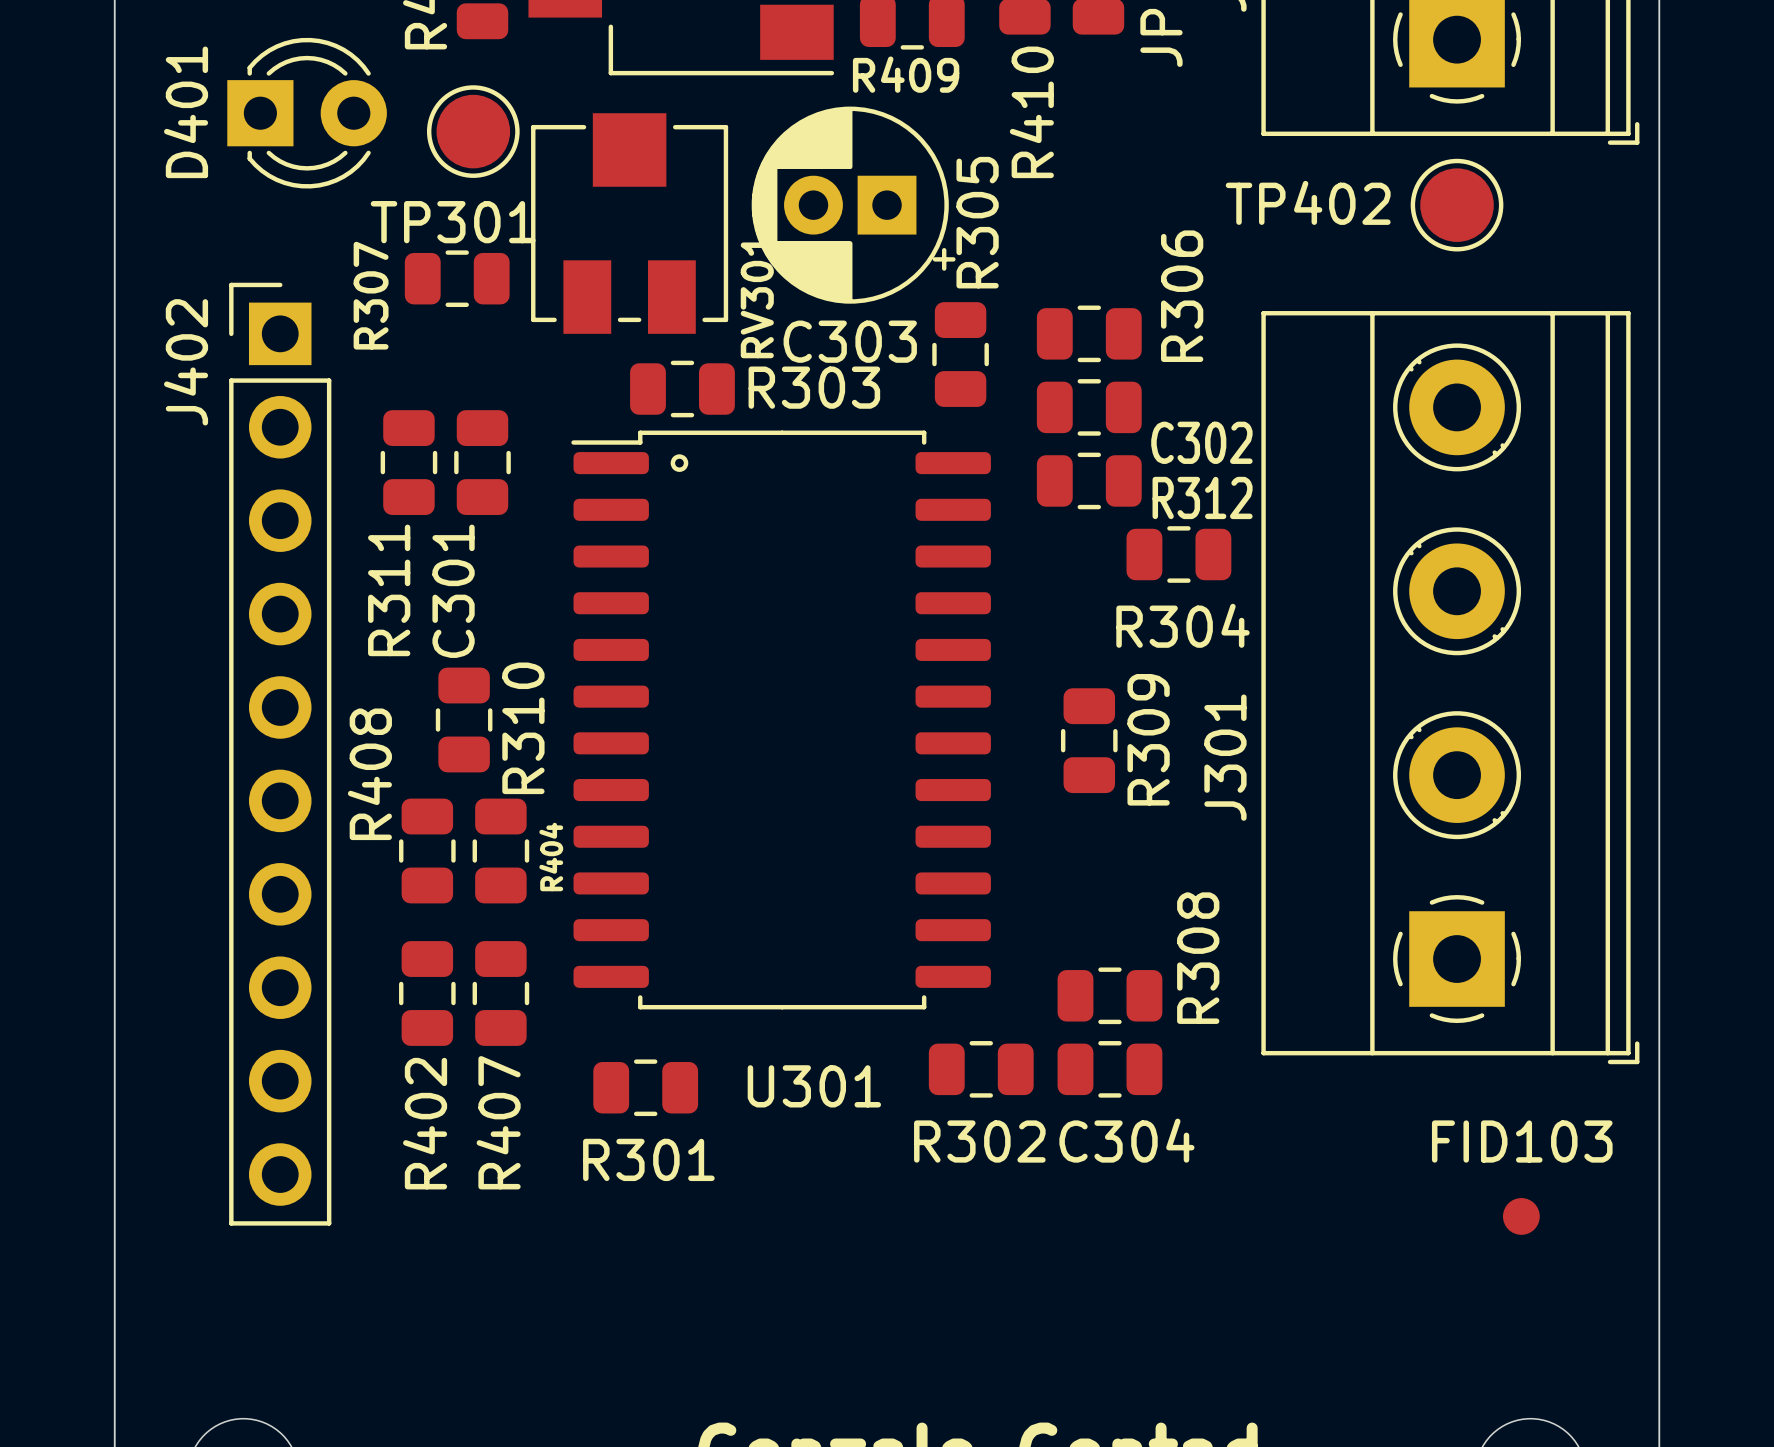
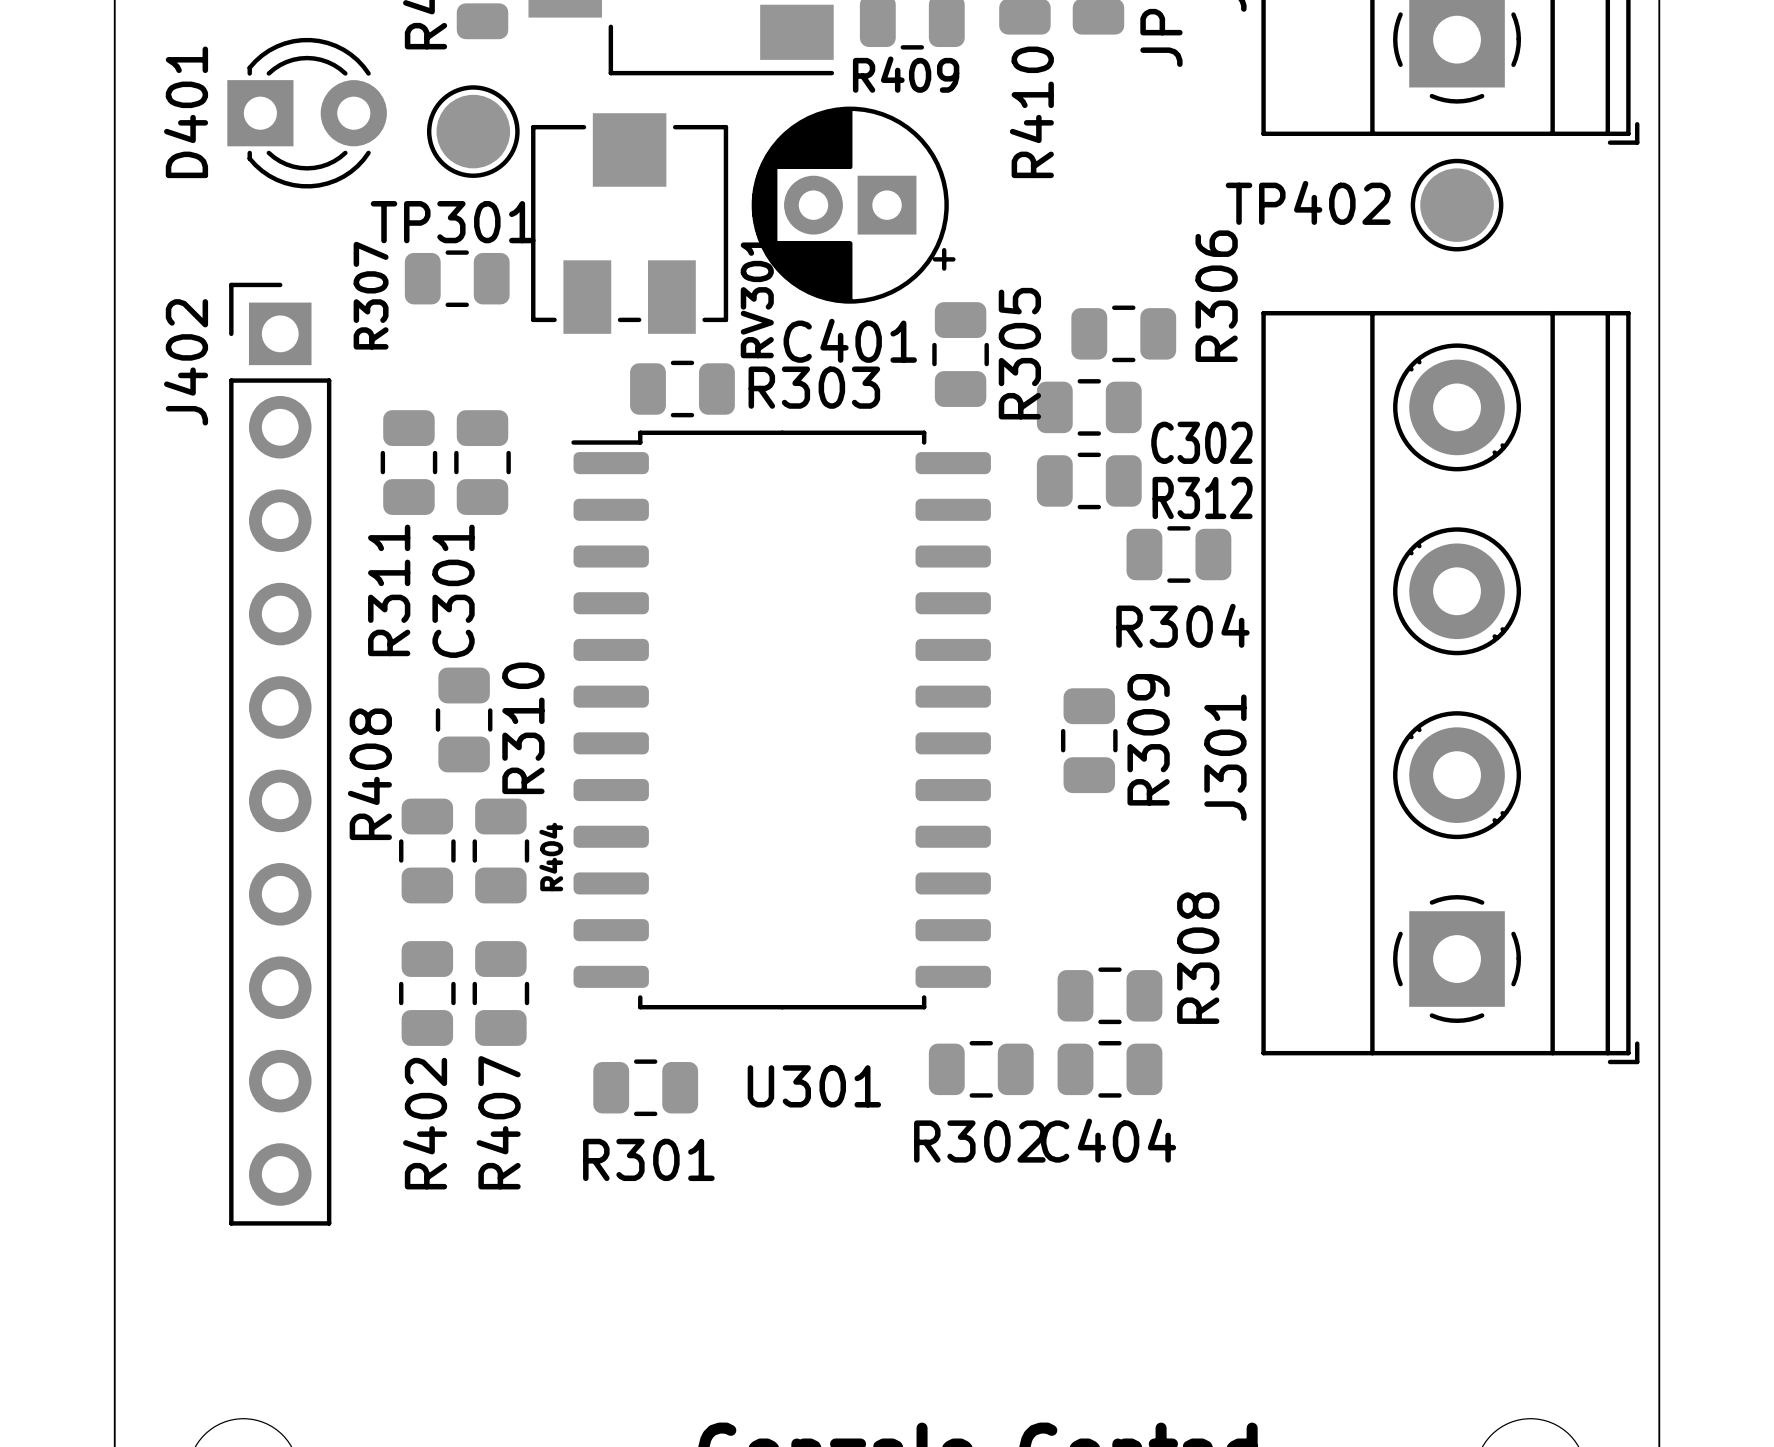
R305 name position: R305 (977, 222) -> R305 (1019, 353)
R306 position: (1089, 333) -> (1123, 333)
C303 name: C303 (850, 341) -> C401 (850, 340)
U301 footprint: [571, 430, 991, 1010] -> [571, 430, 991, 1010]
C304 name: C304 (1126, 1140) -> C404 (1108, 1140)
FID103: (1521, 1216) -> none

